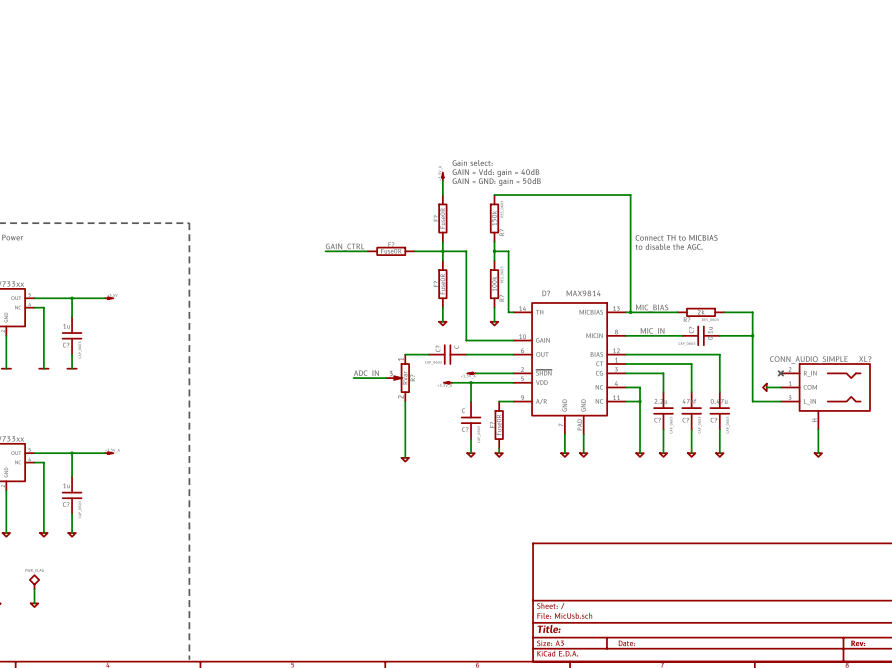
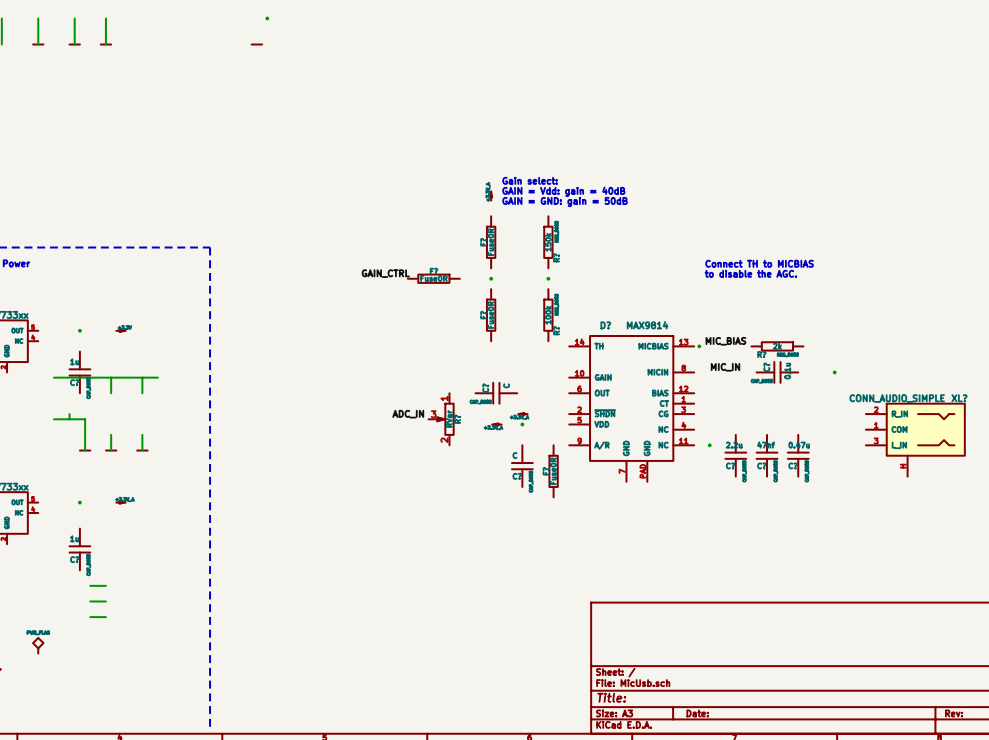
wire: none -> (1, 18) (1, 44)
wire: none -> (38, 18) (38, 44)
wire: none -> (74, 18) (74, 44)
wire: none -> (105, 18) (105, 44)
junction: none -> (267, 18)
power symbol: none -> (38, 44)
power symbol: none -> (74, 44)
power symbol: none -> (105, 44)
power symbol: none -> (256, 44)
wire: (442, 180) (442, 195) -> none
wire: (494, 195) (630, 195) (630, 312) -> none
wire: (442, 241) (442, 260) -> none
wire: (494, 241) (494, 260) -> none
wire: (325, 251) (367, 251) -> none
wire: (414, 251) (466, 251) (466, 340) (513, 340) -> none
wire: (494, 251) (508, 251) (508, 312) (513, 312) -> none
wire: (34, 298) (104, 298) -> none
wire: (72, 298) (72, 317) -> none
wire: (34, 307) (43, 307) (43, 368) -> none
wire: (442, 307) (442, 321) -> none
wire: (494, 307) (494, 321) -> none
wire: (625, 312) (677, 312) -> none
wire: (724, 312) (752, 312) (752, 401) (780, 401) -> none
power symbol: (442, 323) -> none
power symbol: (494, 323) -> none
wire: (6, 335) (6, 368) -> none
wire: (625, 335) (682, 335) -> none
wire: (719, 335) (752, 335) -> none
wire: none -> (53, 377) (157, 377)
wire: none -> (142, 377) (142, 393)
wire: (72, 354) (72, 368) -> (111, 377) (111, 393)
wire: (405, 354) (428, 354) -> none
wire: (466, 354) (513, 354) -> none
wire: (625, 354) (719, 354) (719, 392) -> none
wire: (625, 364) (691, 364) (691, 392) -> none
power symbol: (6, 368) -> none
power symbol: (43, 368) -> none
power symbol: (72, 368) -> none
wire: none -> (69, 414) (69, 419)
wire: (475, 373) (513, 373) -> none
wire: (625, 373) (663, 373) (663, 392) -> none
no-connect mark: (780, 373) -> none
wire: none -> (53, 419) (85, 419) (85, 450)
wire: (353, 378) (386, 378) -> none
wire: (452, 382) (513, 382) -> none
wire: (471, 382) (471, 401) -> none
wire: (625, 387) (640, 387) (640, 453) -> none
power symbol: (764, 387) -> none
wire: (766, 387) (780, 387) -> none
wire: none -> (111, 434) (111, 450)
wire: none -> (142, 434) (142, 450)
wire: (405, 401) (405, 457) -> none
wire: (499, 401) (513, 401) -> none
wire: (625, 401) (640, 401) -> none
power symbol: none -> (85, 450)
power symbol: none -> (111, 450)
power symbol: none -> (142, 450)
wire: (663, 429) (663, 453) -> none
wire: (691, 429) (691, 453) -> none
wire: (719, 429) (719, 453) -> none
wire: (818, 429) (818, 453) -> none
wire: (564, 434) (564, 453) -> none
wire: (583, 434) (583, 453) -> none
wire: (471, 439) (471, 453) -> none
wire: (499, 448) (499, 453) -> none
wire: (34, 453) (104, 453) -> none
wire: (72, 453) (72, 476) -> none
power symbol: (471, 455) -> none
power symbol: (499, 455) -> none
power symbol: (564, 455) -> none
power symbol: (583, 455) -> none
power symbol: (640, 455) -> none
power symbol: (663, 455) -> none
power symbol: (691, 455) -> none
power symbol: (719, 455) -> none
power symbol: (818, 455) -> none
power symbol: (405, 459) -> none
wire: (34, 462) (43, 462) (43, 532) -> none
wire: (6, 490) (6, 532) -> none
wire: (72, 514) (72, 532) -> none
wire: none -> (90, 585) (105, 585)
power symbol: (6, 534) -> none
power symbol: (43, 534) -> none
power symbol: (72, 534) -> none
wire: none -> (90, 601) (105, 601)
wire: none -> (90, 617) (105, 617)
wire: (34, 589) (34, 603) -> none
power symbol: (34, 605) -> none

